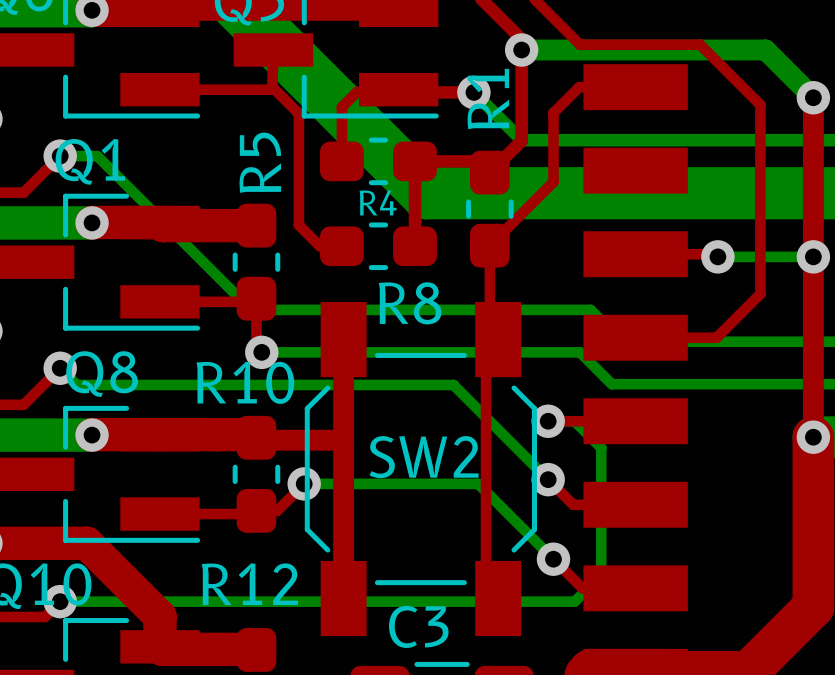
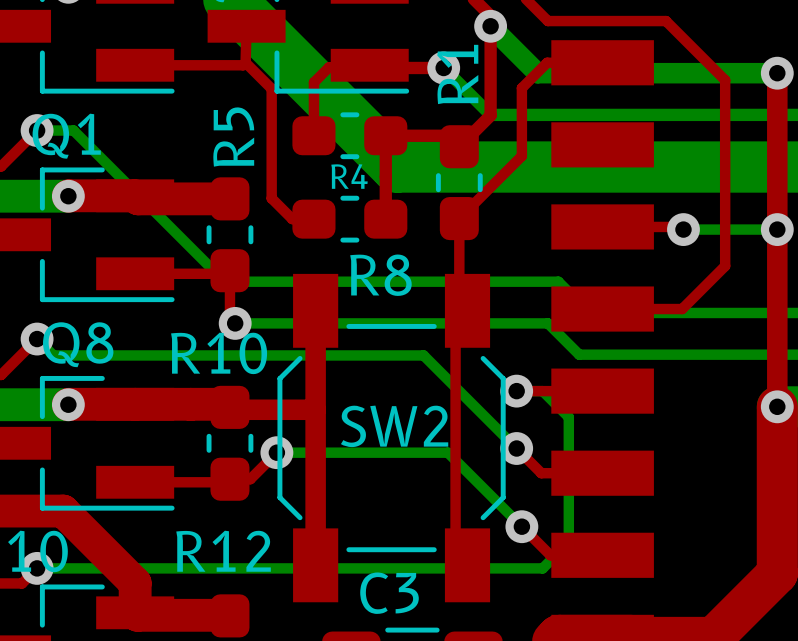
bottom track: (521, 50) (765, 50) (813, 97) -> (490, 26) (537, 73) (777, 73)

